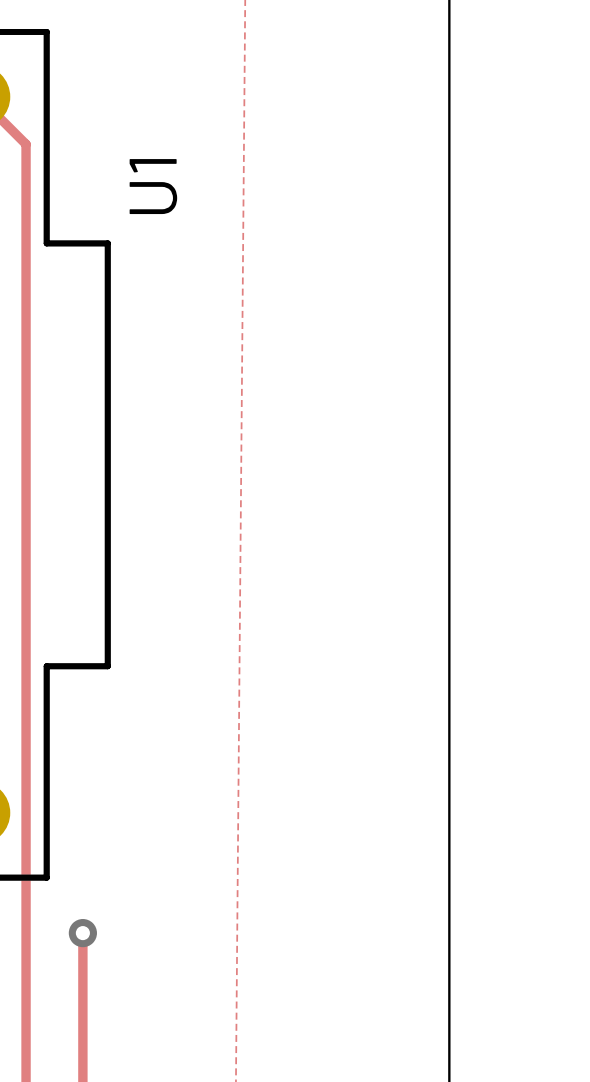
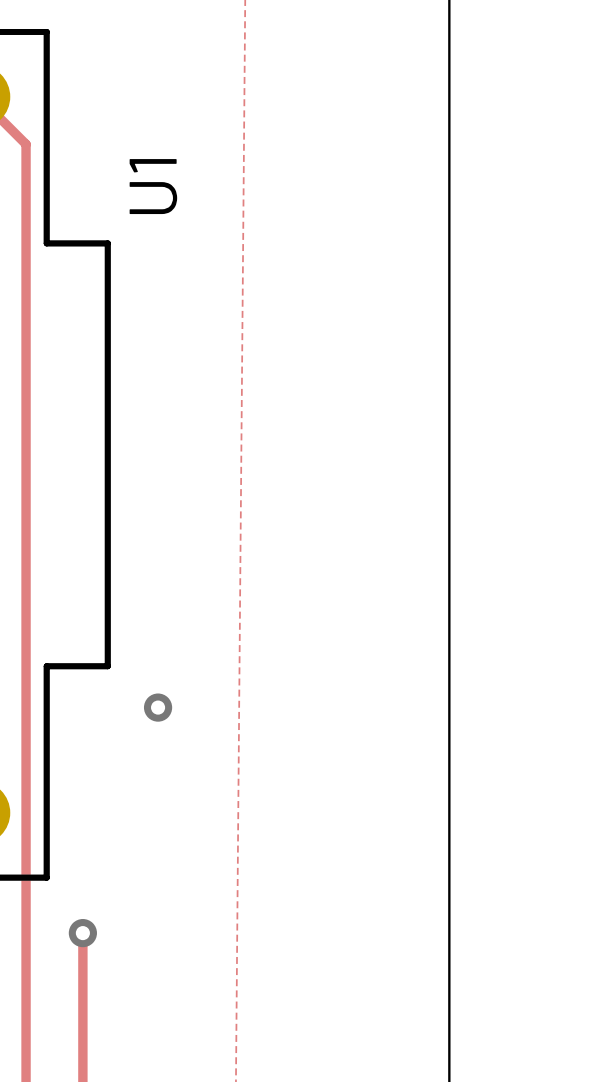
via: none -> (158, 707)

